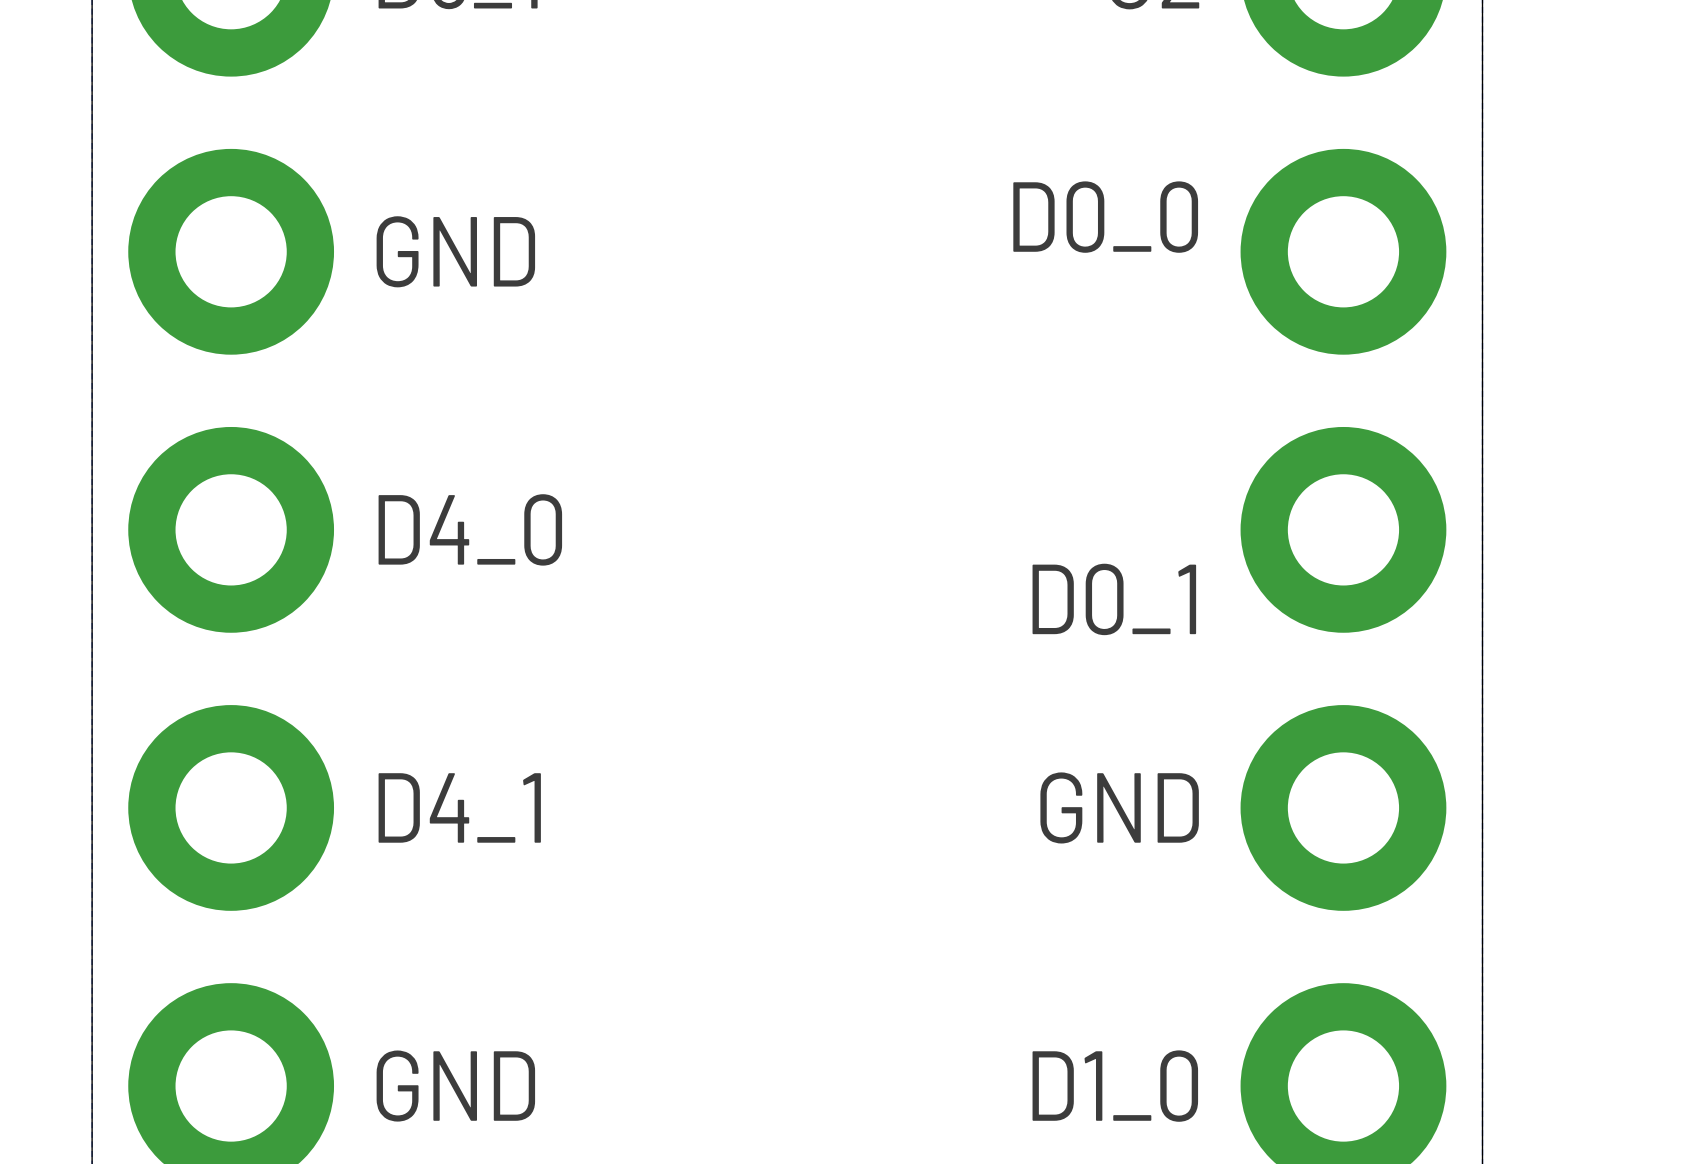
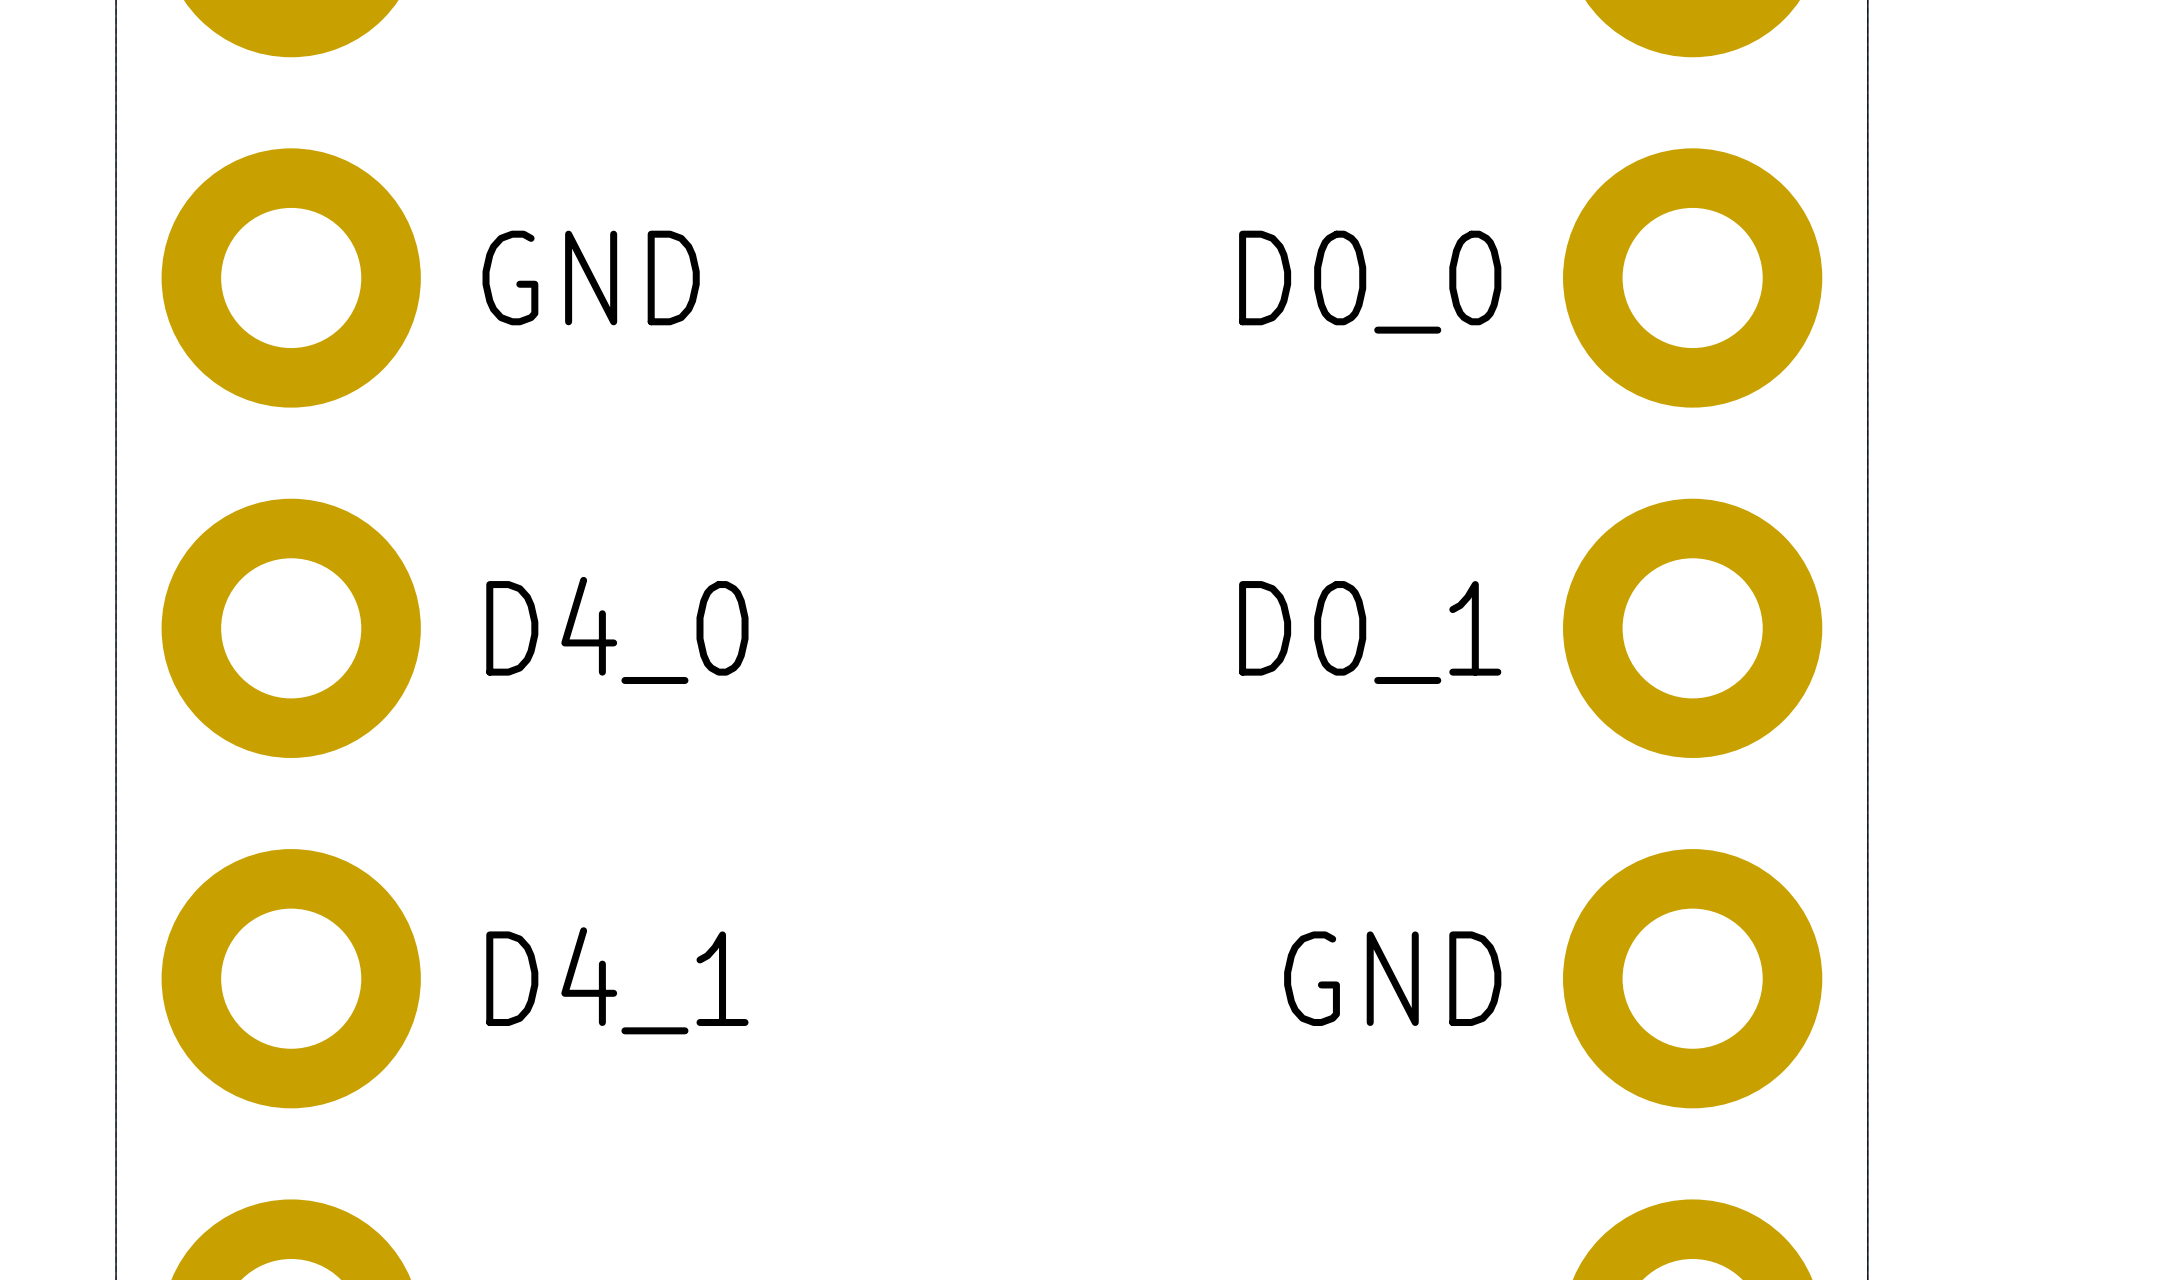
text position: D0_0 (1105, 217) -> D0_0 (1370, 282)
text position: D0_1 (1114, 599) -> D0_1 (1370, 632)

